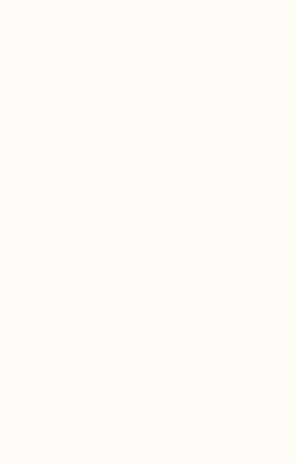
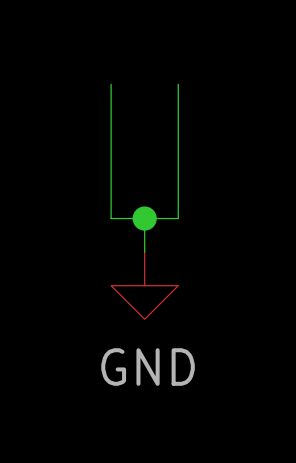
wire: none -> (111, 84) (111, 218) (178, 218) (178, 84)
wire: none -> (144, 218) (144, 252)
junction: none -> (144, 218)
power symbol: none -> GND (144, 285)

